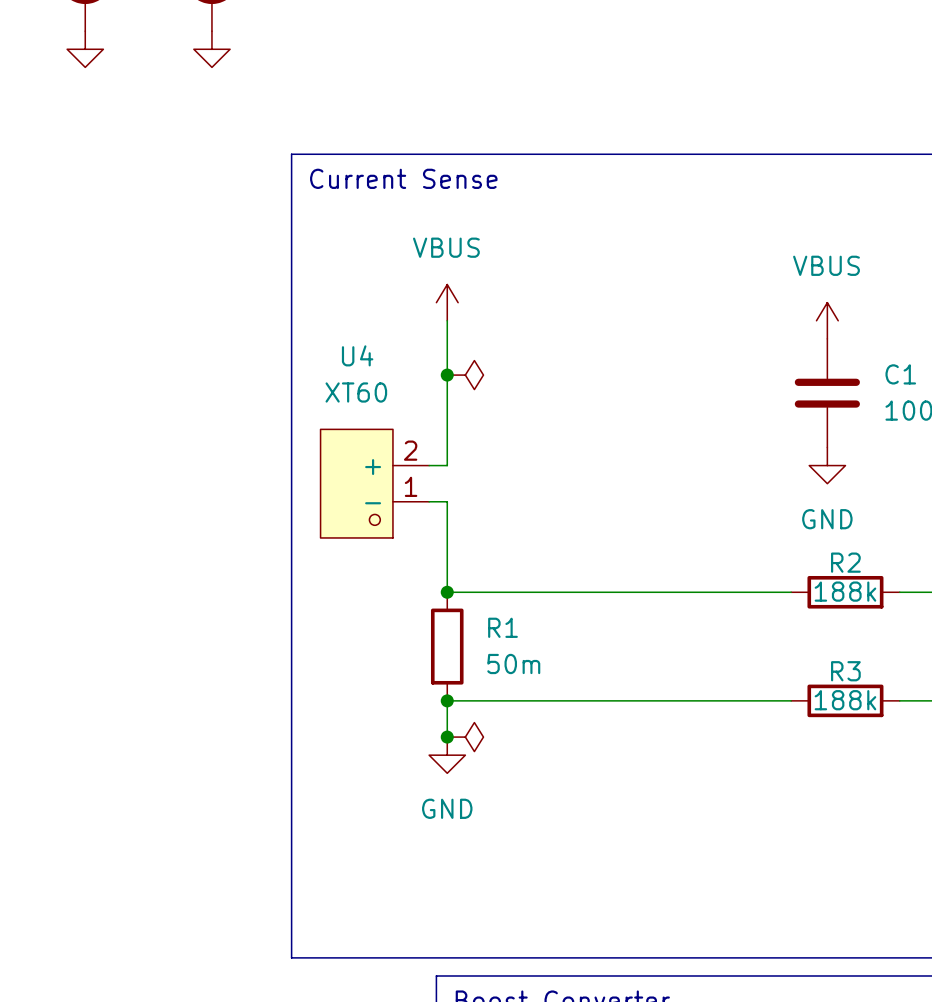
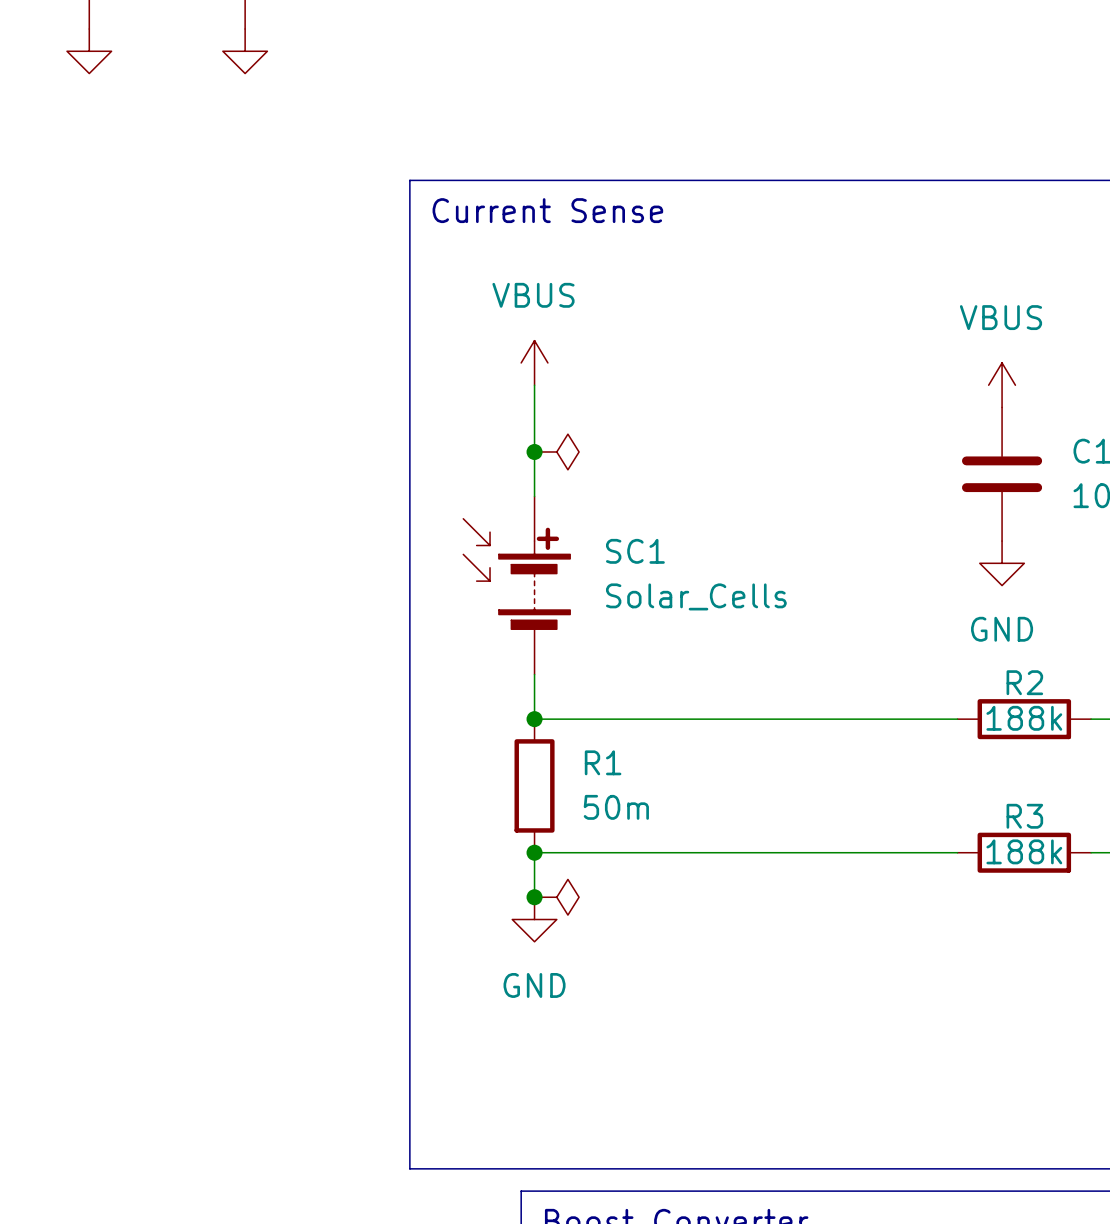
line: (345, 154) (291, 154) (291, 957) (345, 957) -> (409, 180) (409, 1168)
text position: Current Sense (403, 178) -> Current Sense (547, 210)
U4: XT60 (374, 483) -> none
SC1: none -> Solar_Cells (516, 585)

